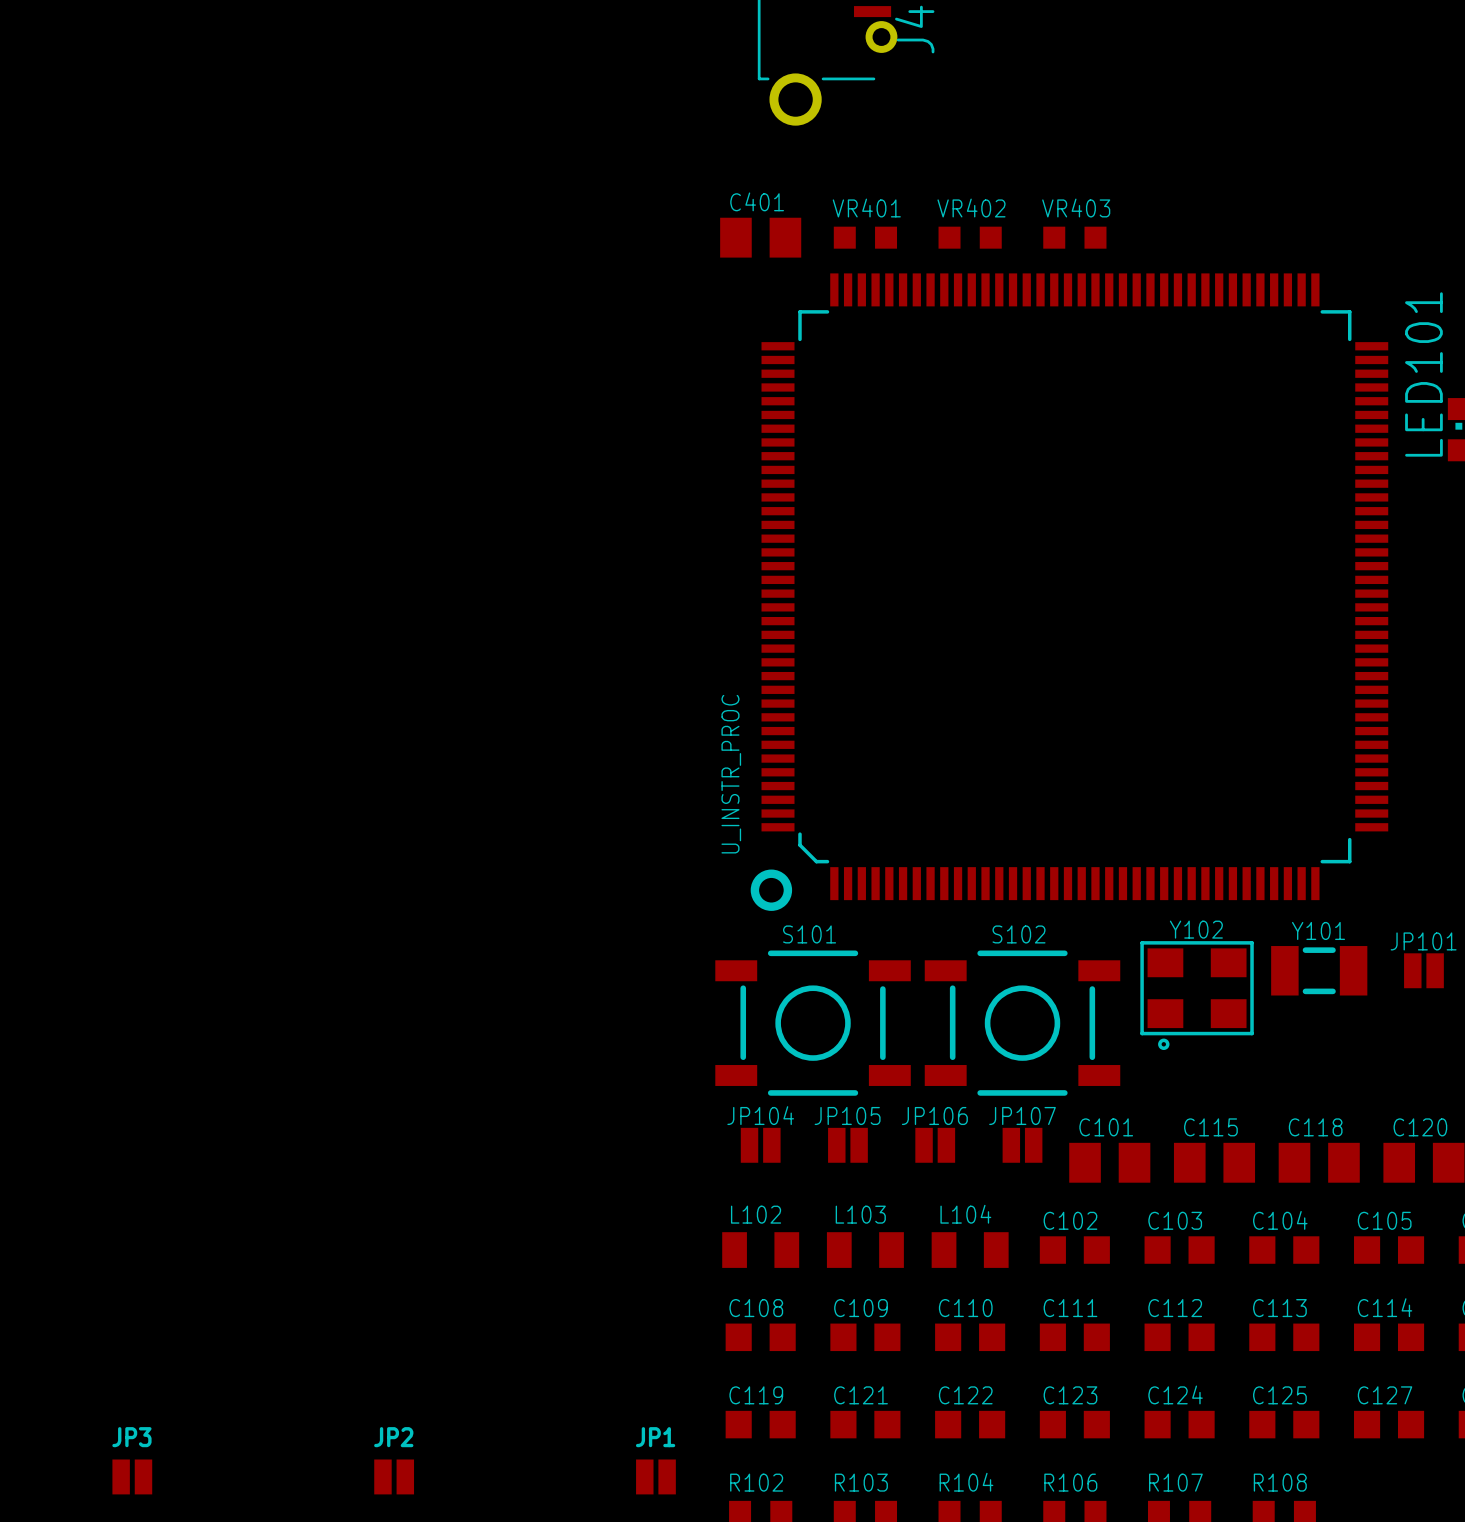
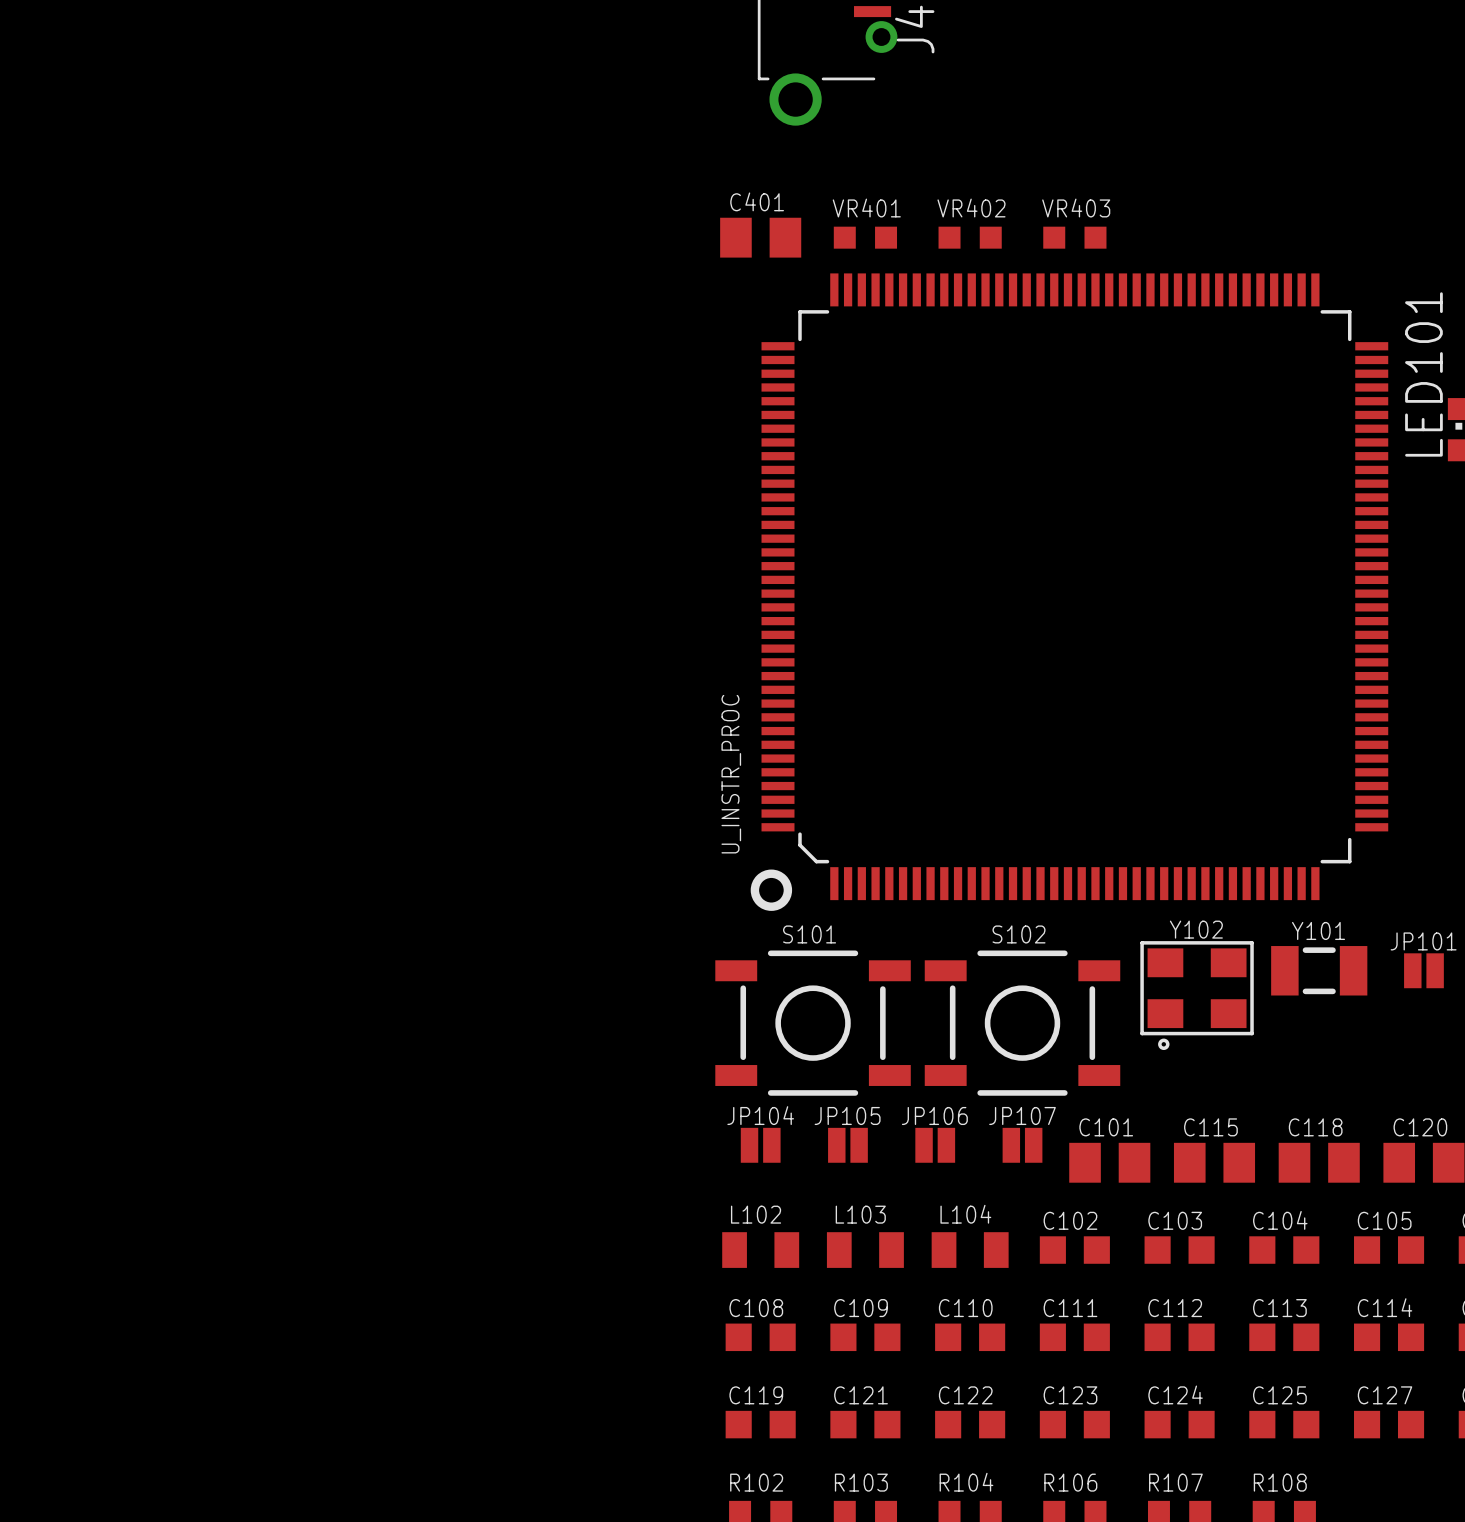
JP3: (132, 1476) -> none
JP2: (394, 1476) -> none
JP1: (655, 1476) -> none

